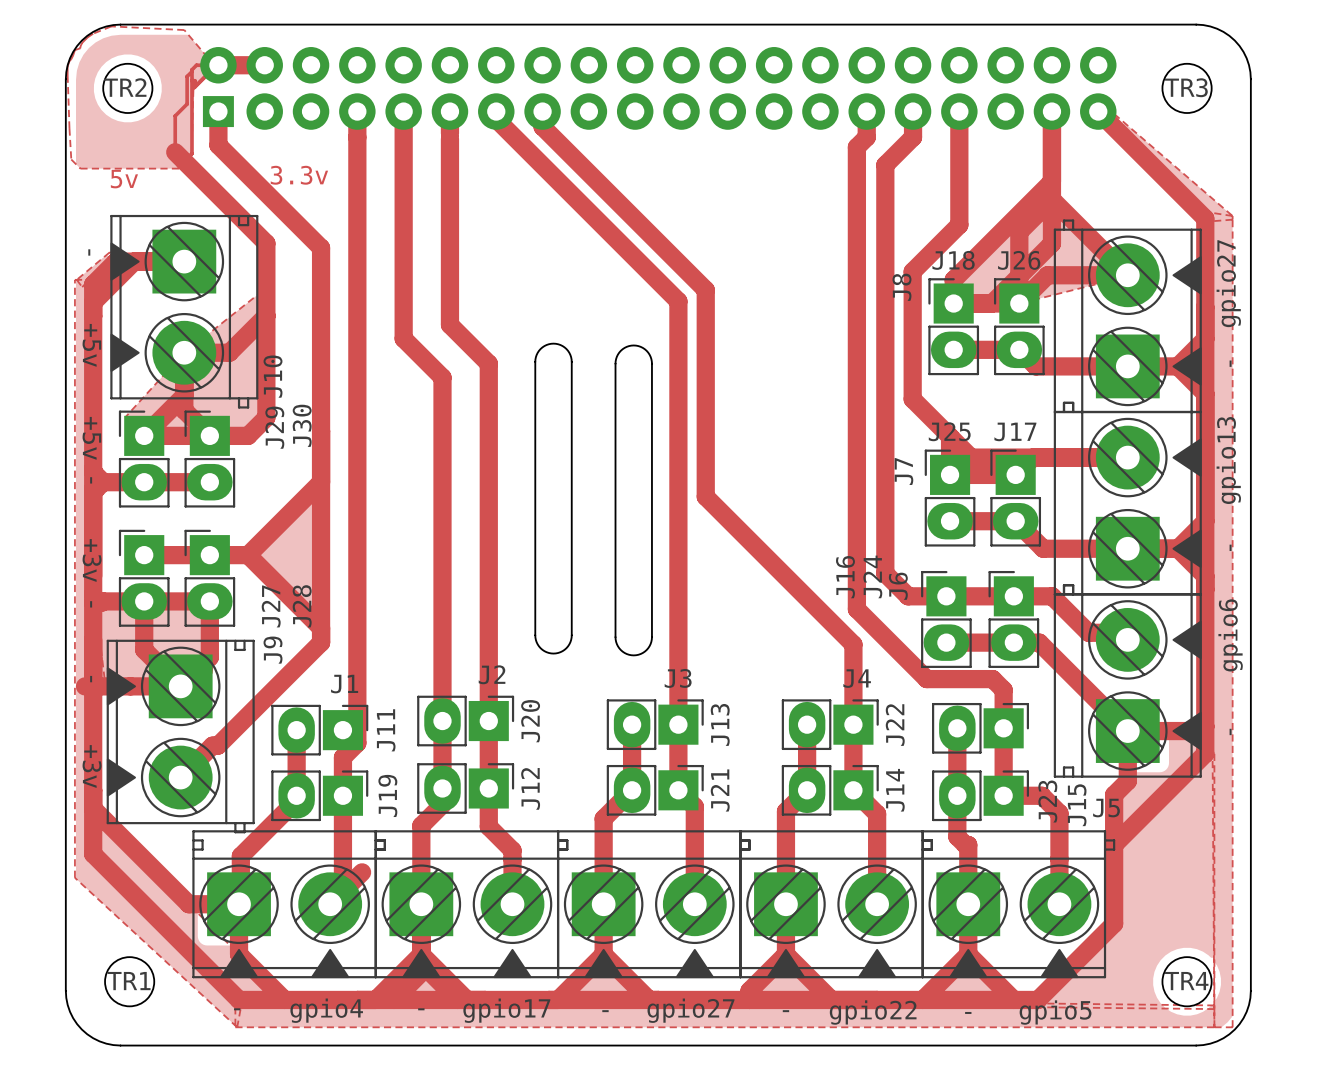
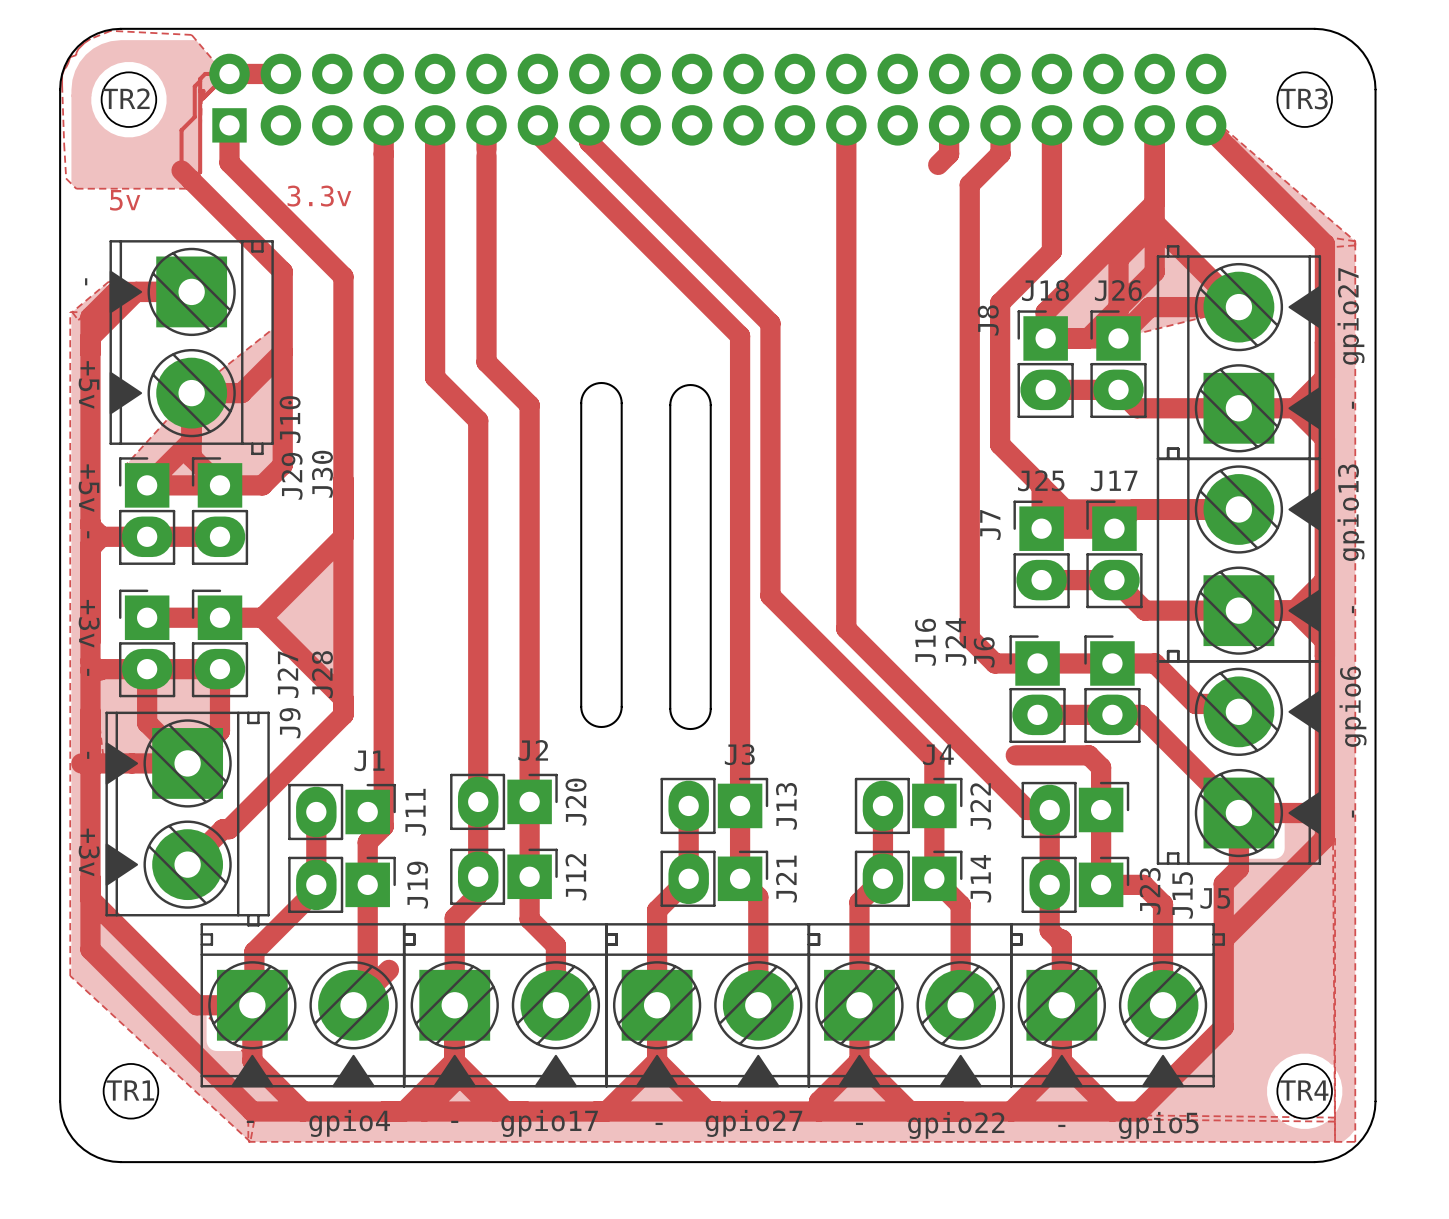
track: none -> (846, 125) (846, 628)
track: (856, 147) (856, 609) (926, 679) -> none
track: (705, 496) (774, 565) -> (770, 552) (770, 595) (934, 759)
track: (853, 644) (853, 683) -> (934, 716) (1027, 809) (1049, 809)

